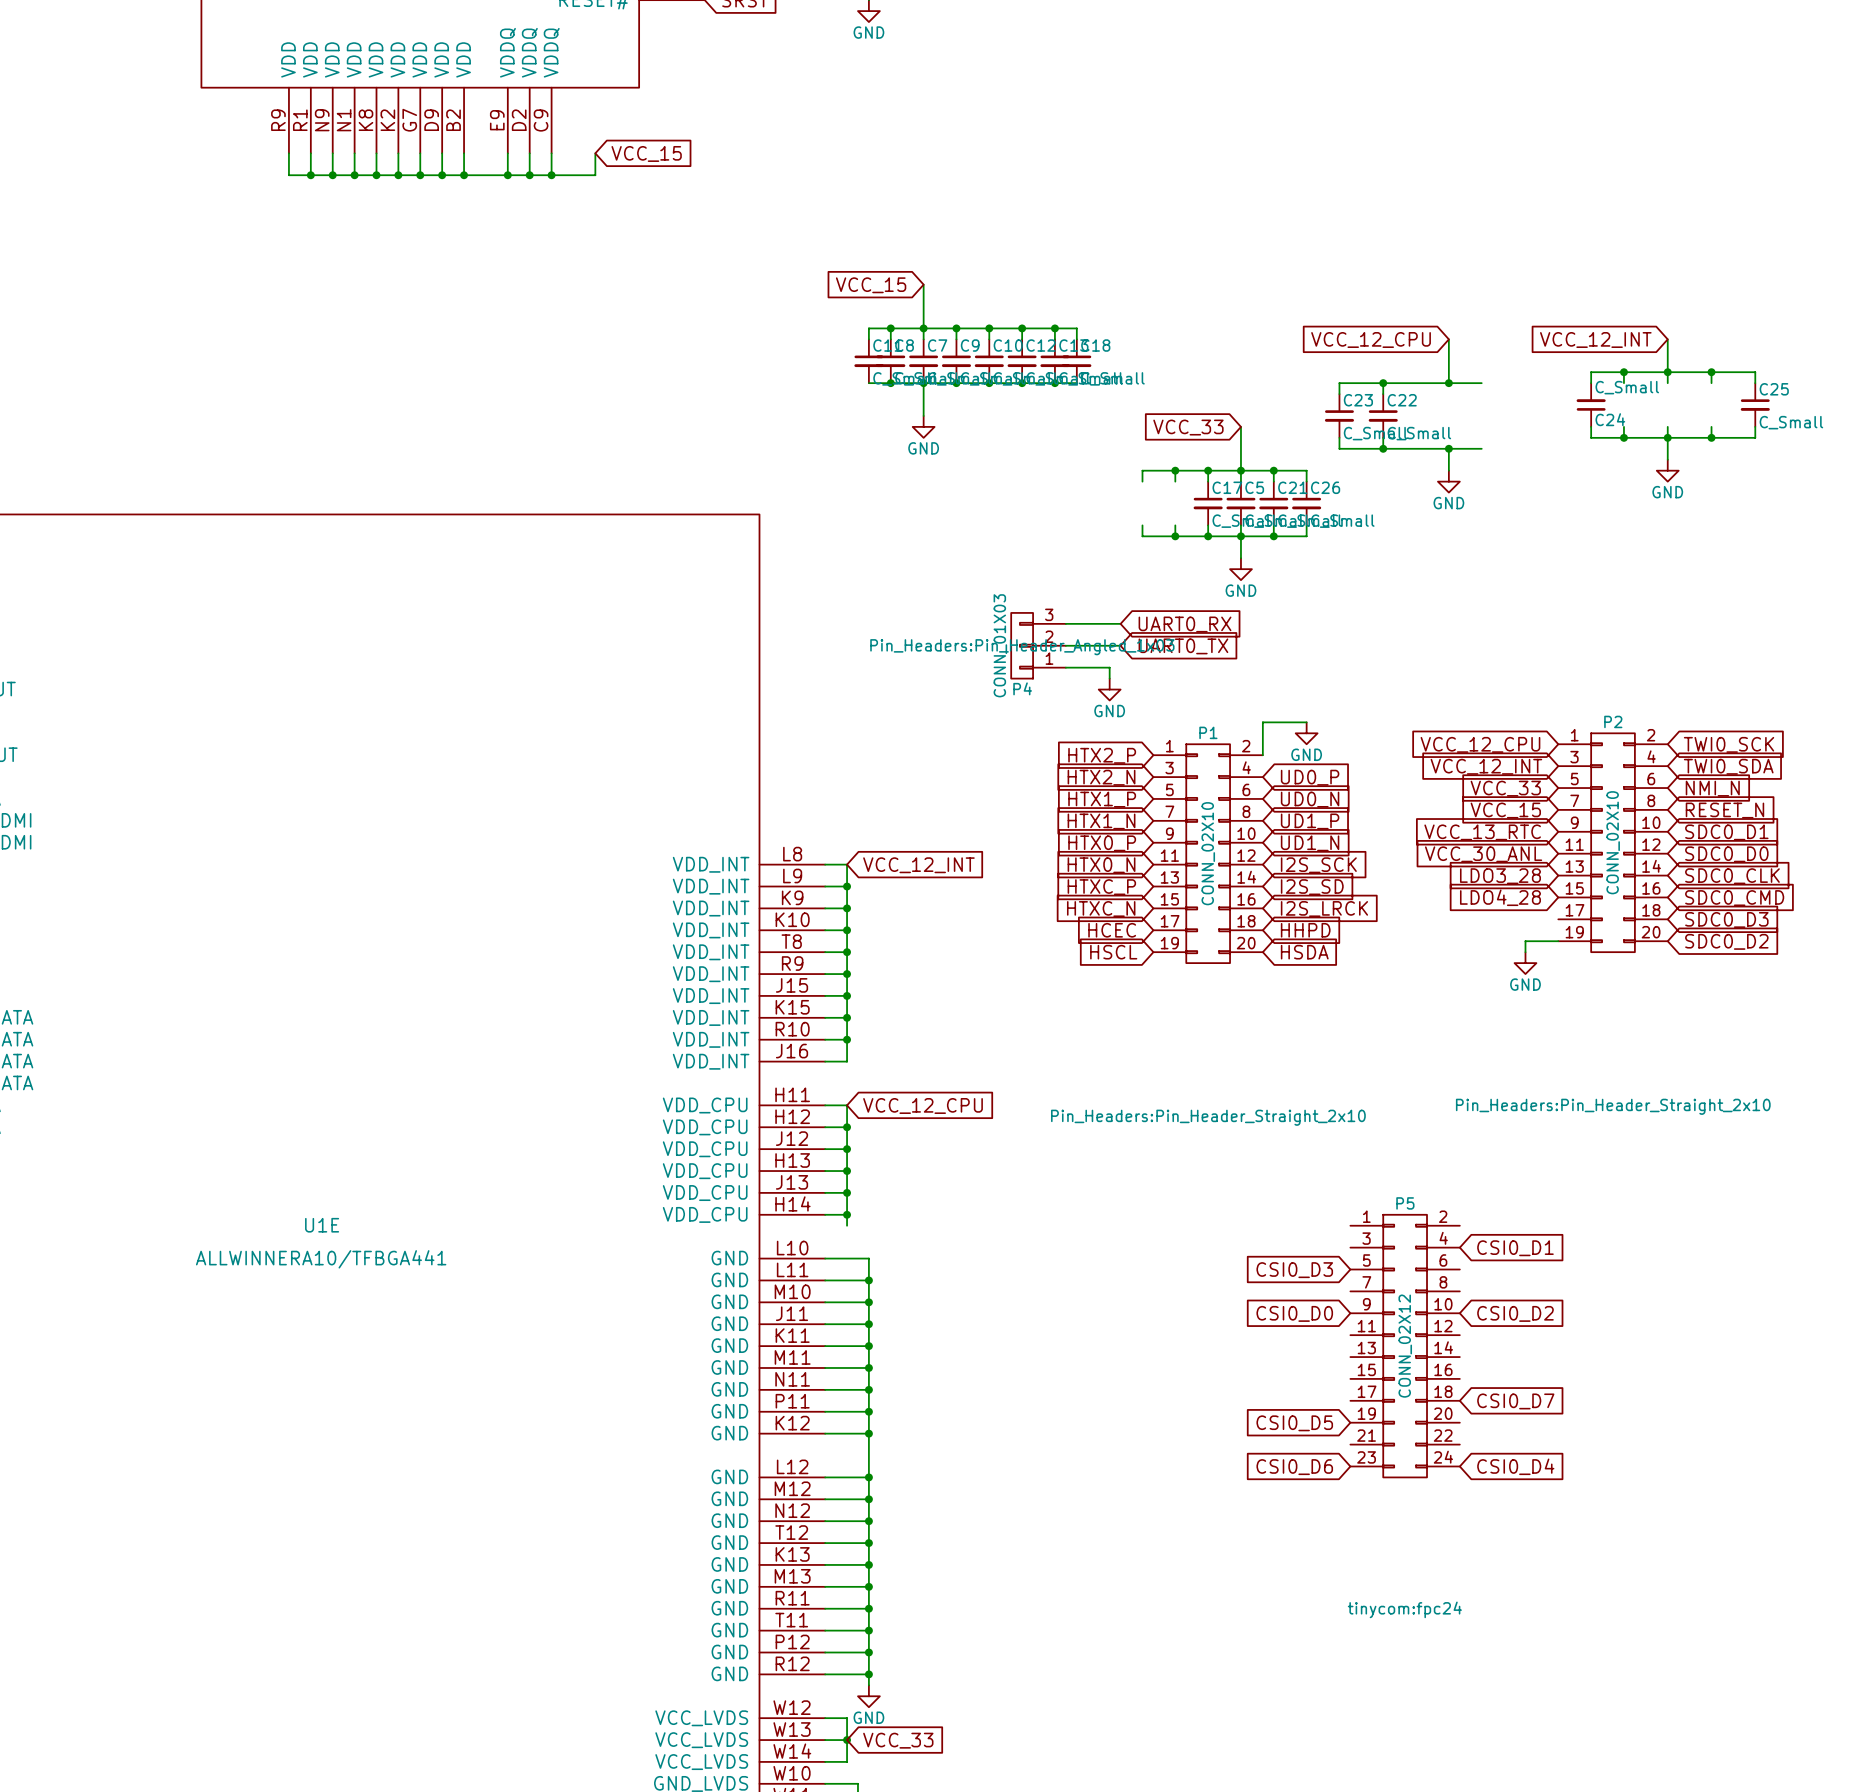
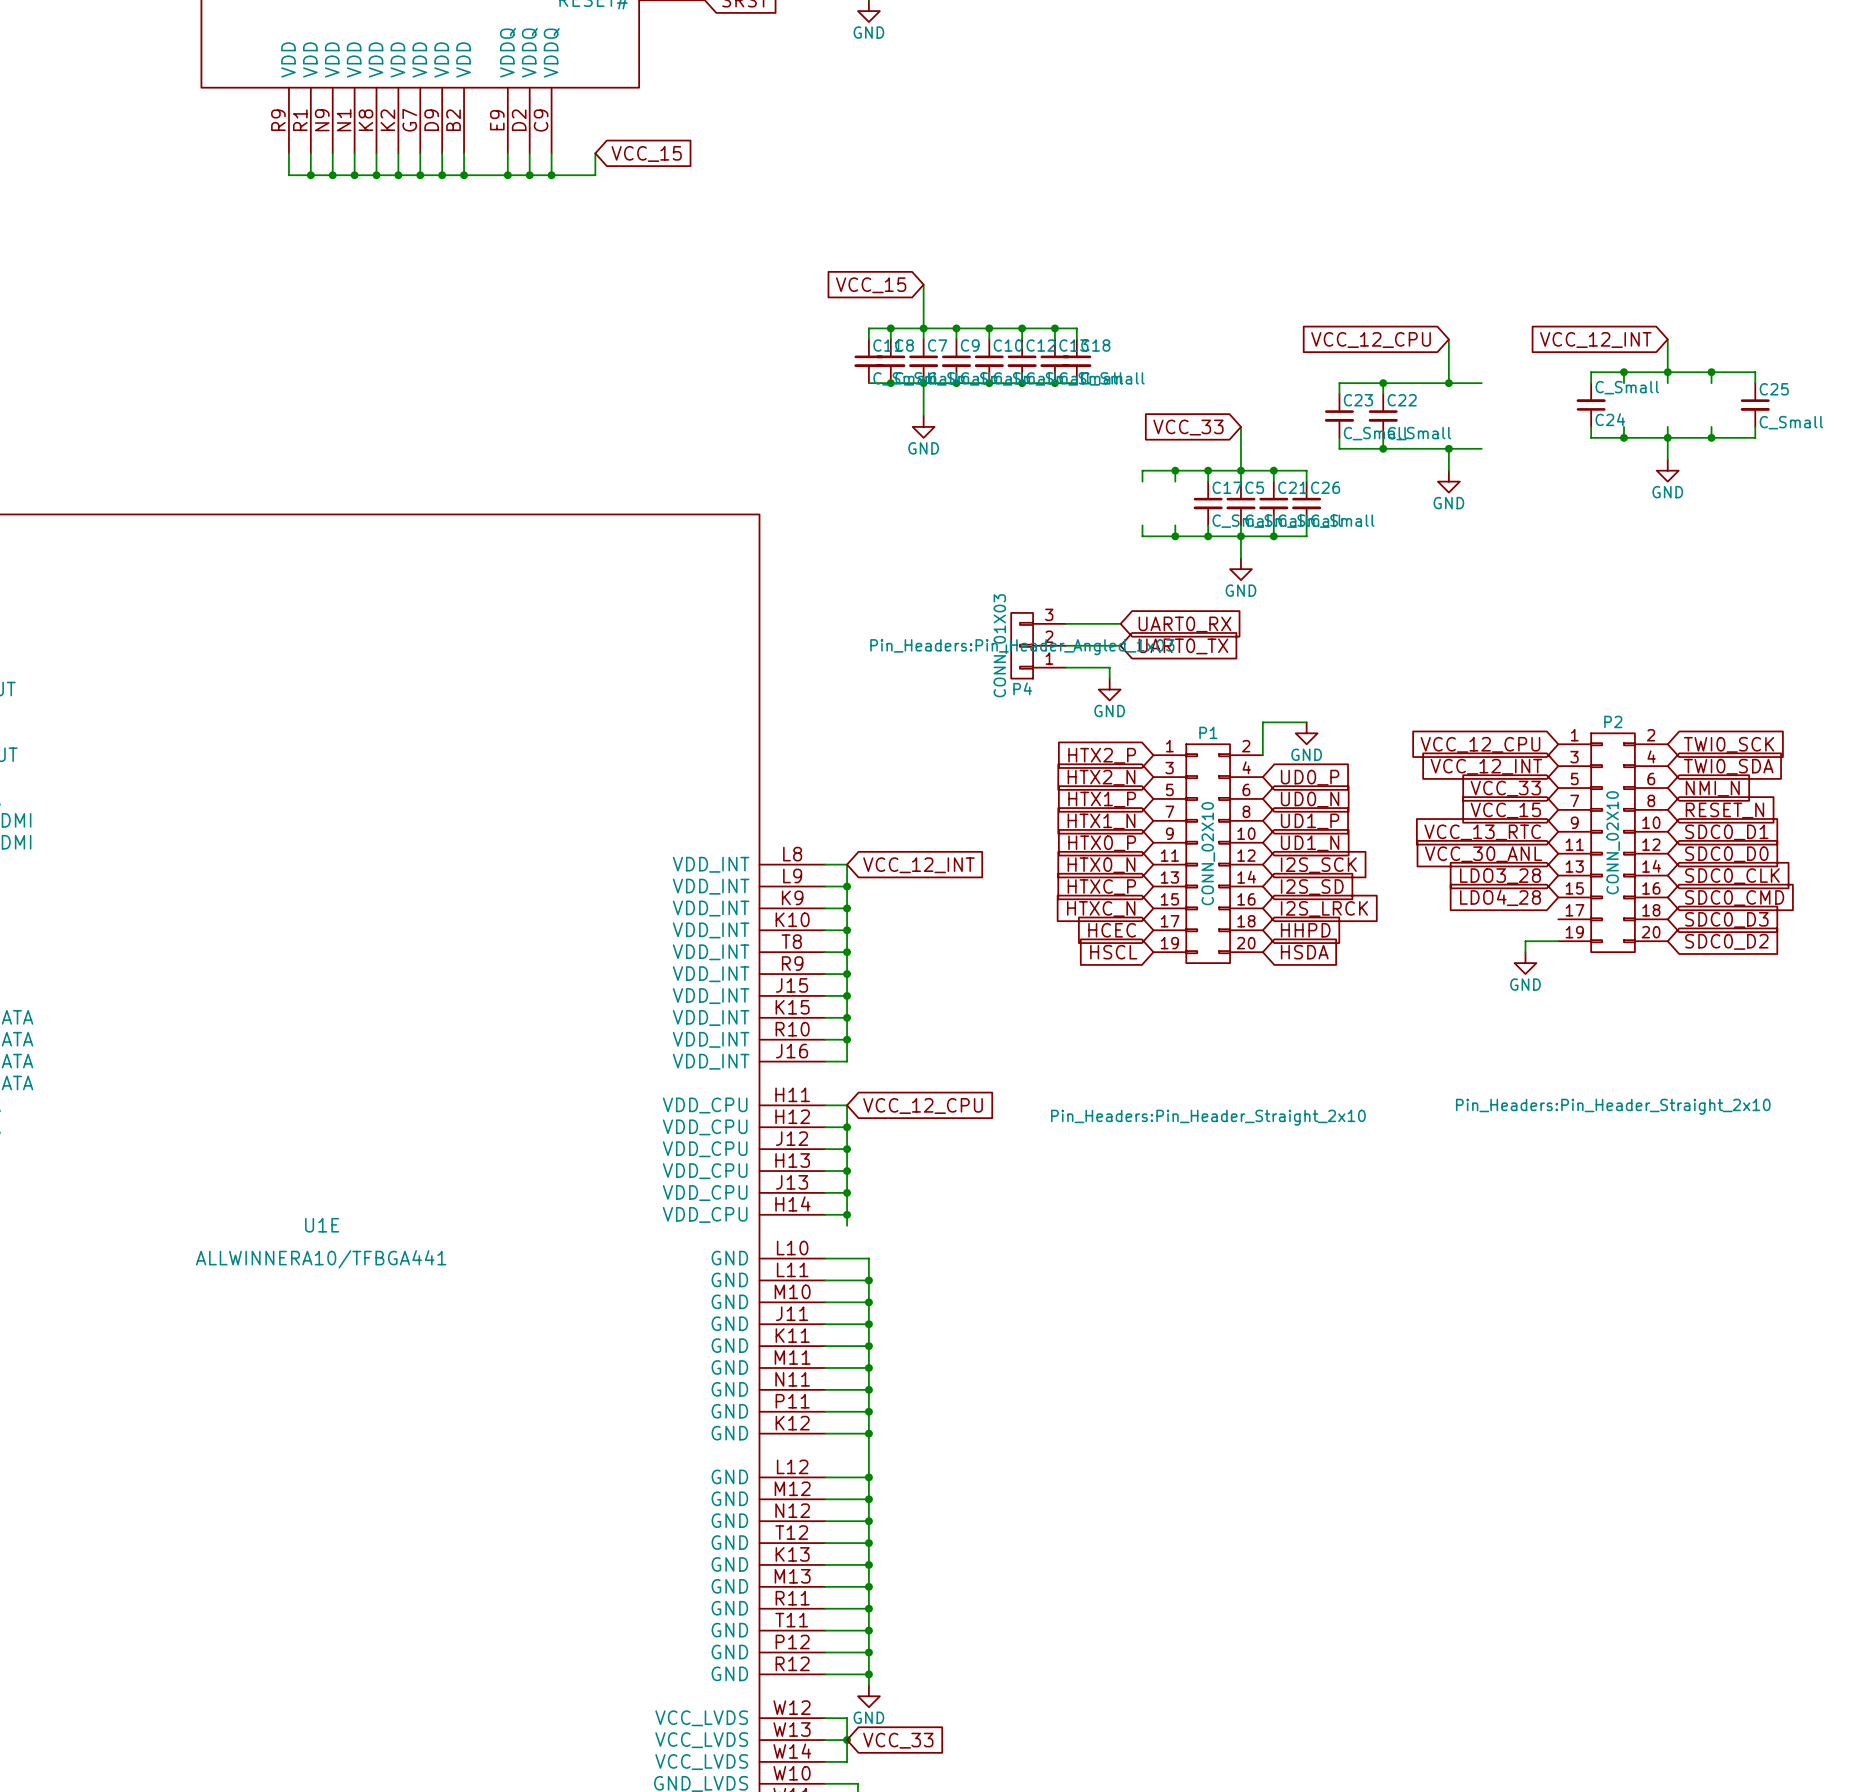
global label: CSI0_D1 (1515, 1248) -> none
global label: CSI0_D3 (1294, 1270) -> none
global label: CSI0_D0 (1294, 1313) -> none
global label: CSI0_D2 (1515, 1313) -> none
P5: CONN_02X12 (1405, 1346) -> none
global label: CSI0_D7 (1515, 1401) -> none
global label: CSI0_D5 (1294, 1423) -> none
global label: CSI0_D4 (1515, 1466) -> none
global label: CSI0_D6 (1294, 1467) -> none

